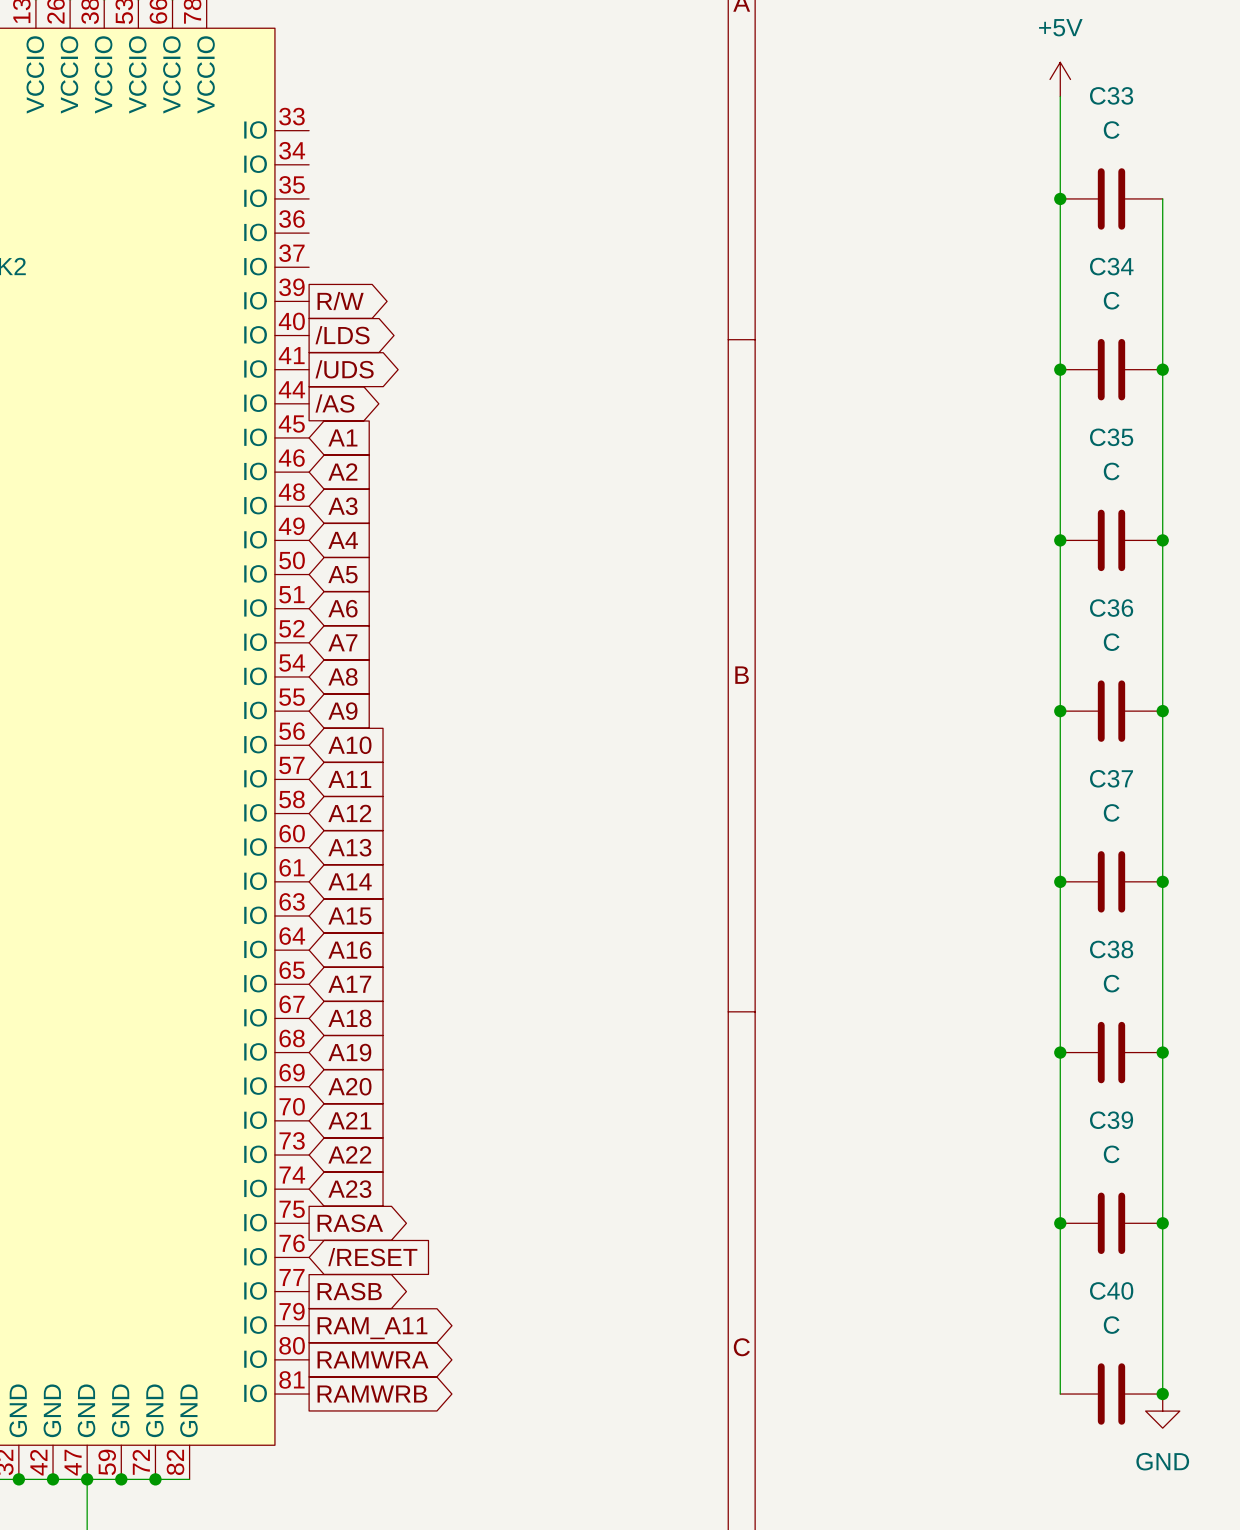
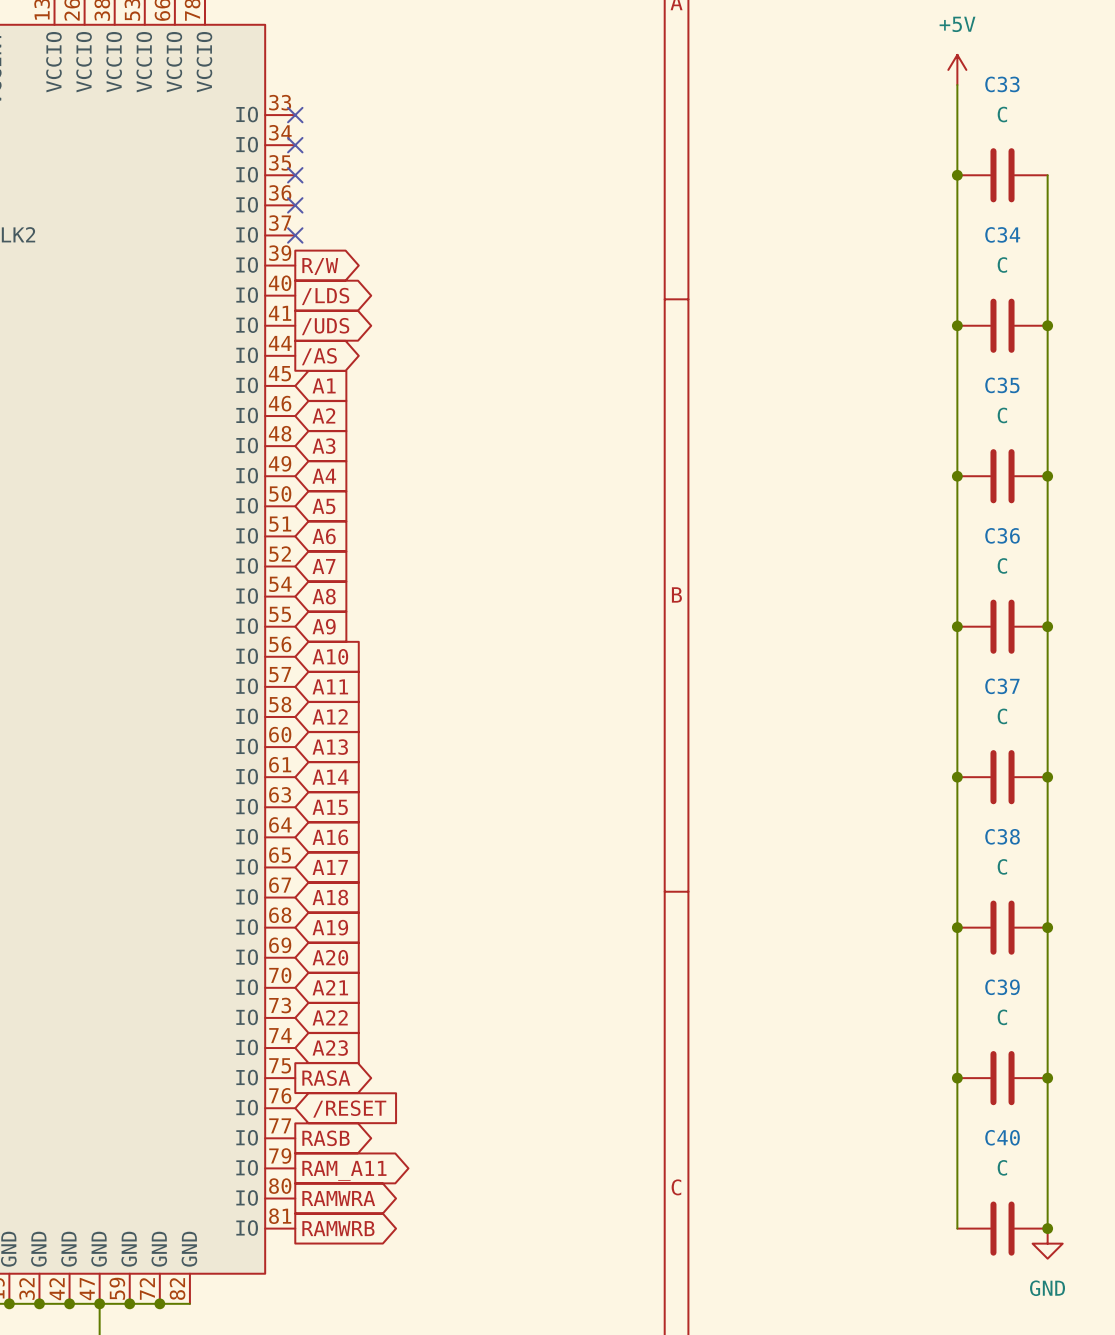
no-connect mark: none -> (295, 115)
no-connect mark: none -> (295, 145)
no-connect mark: none -> (295, 175)
no-connect mark: none -> (295, 205)
no-connect mark: none -> (295, 235)

